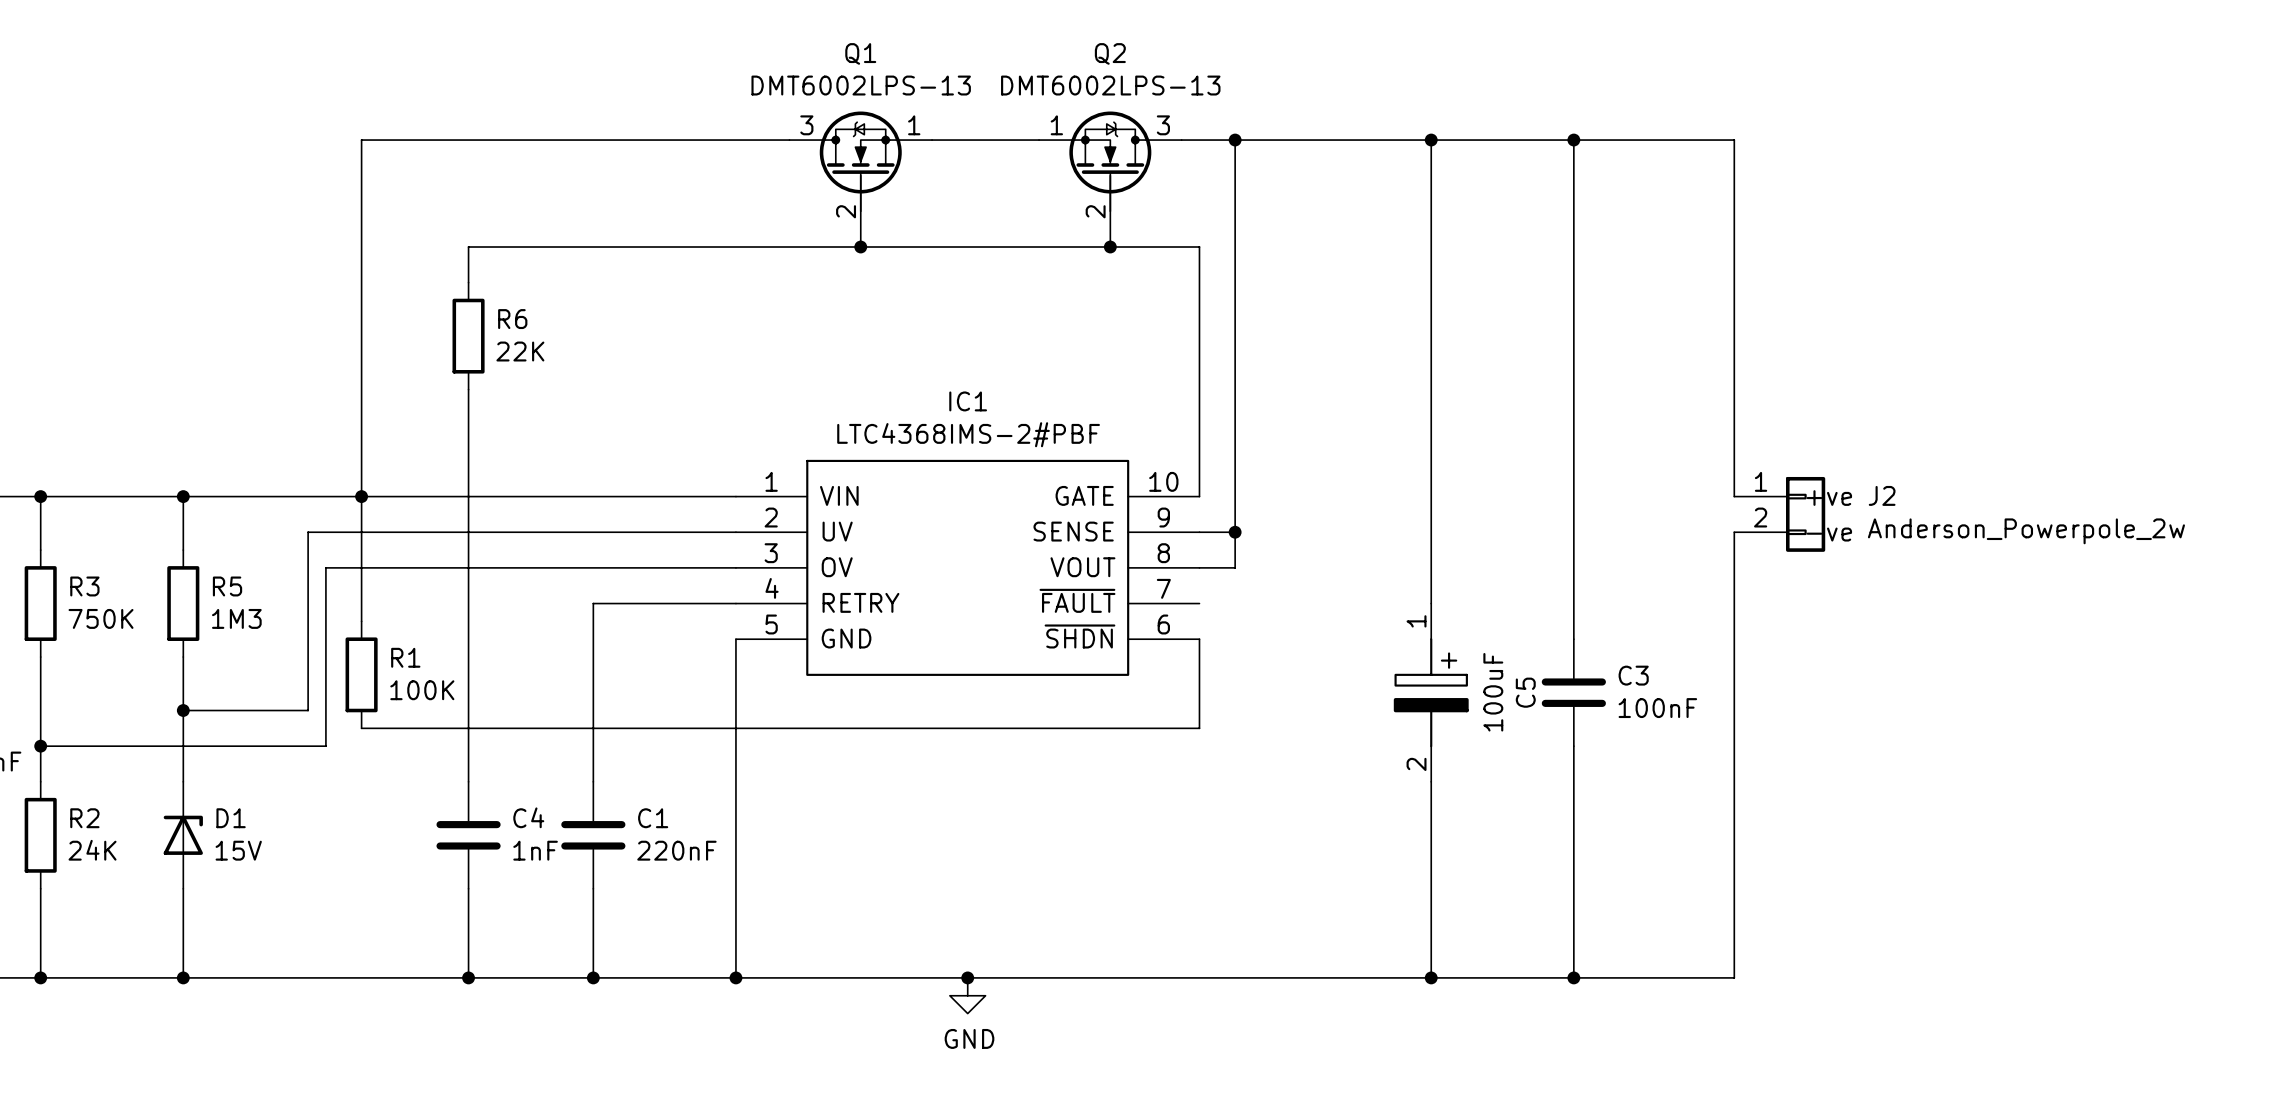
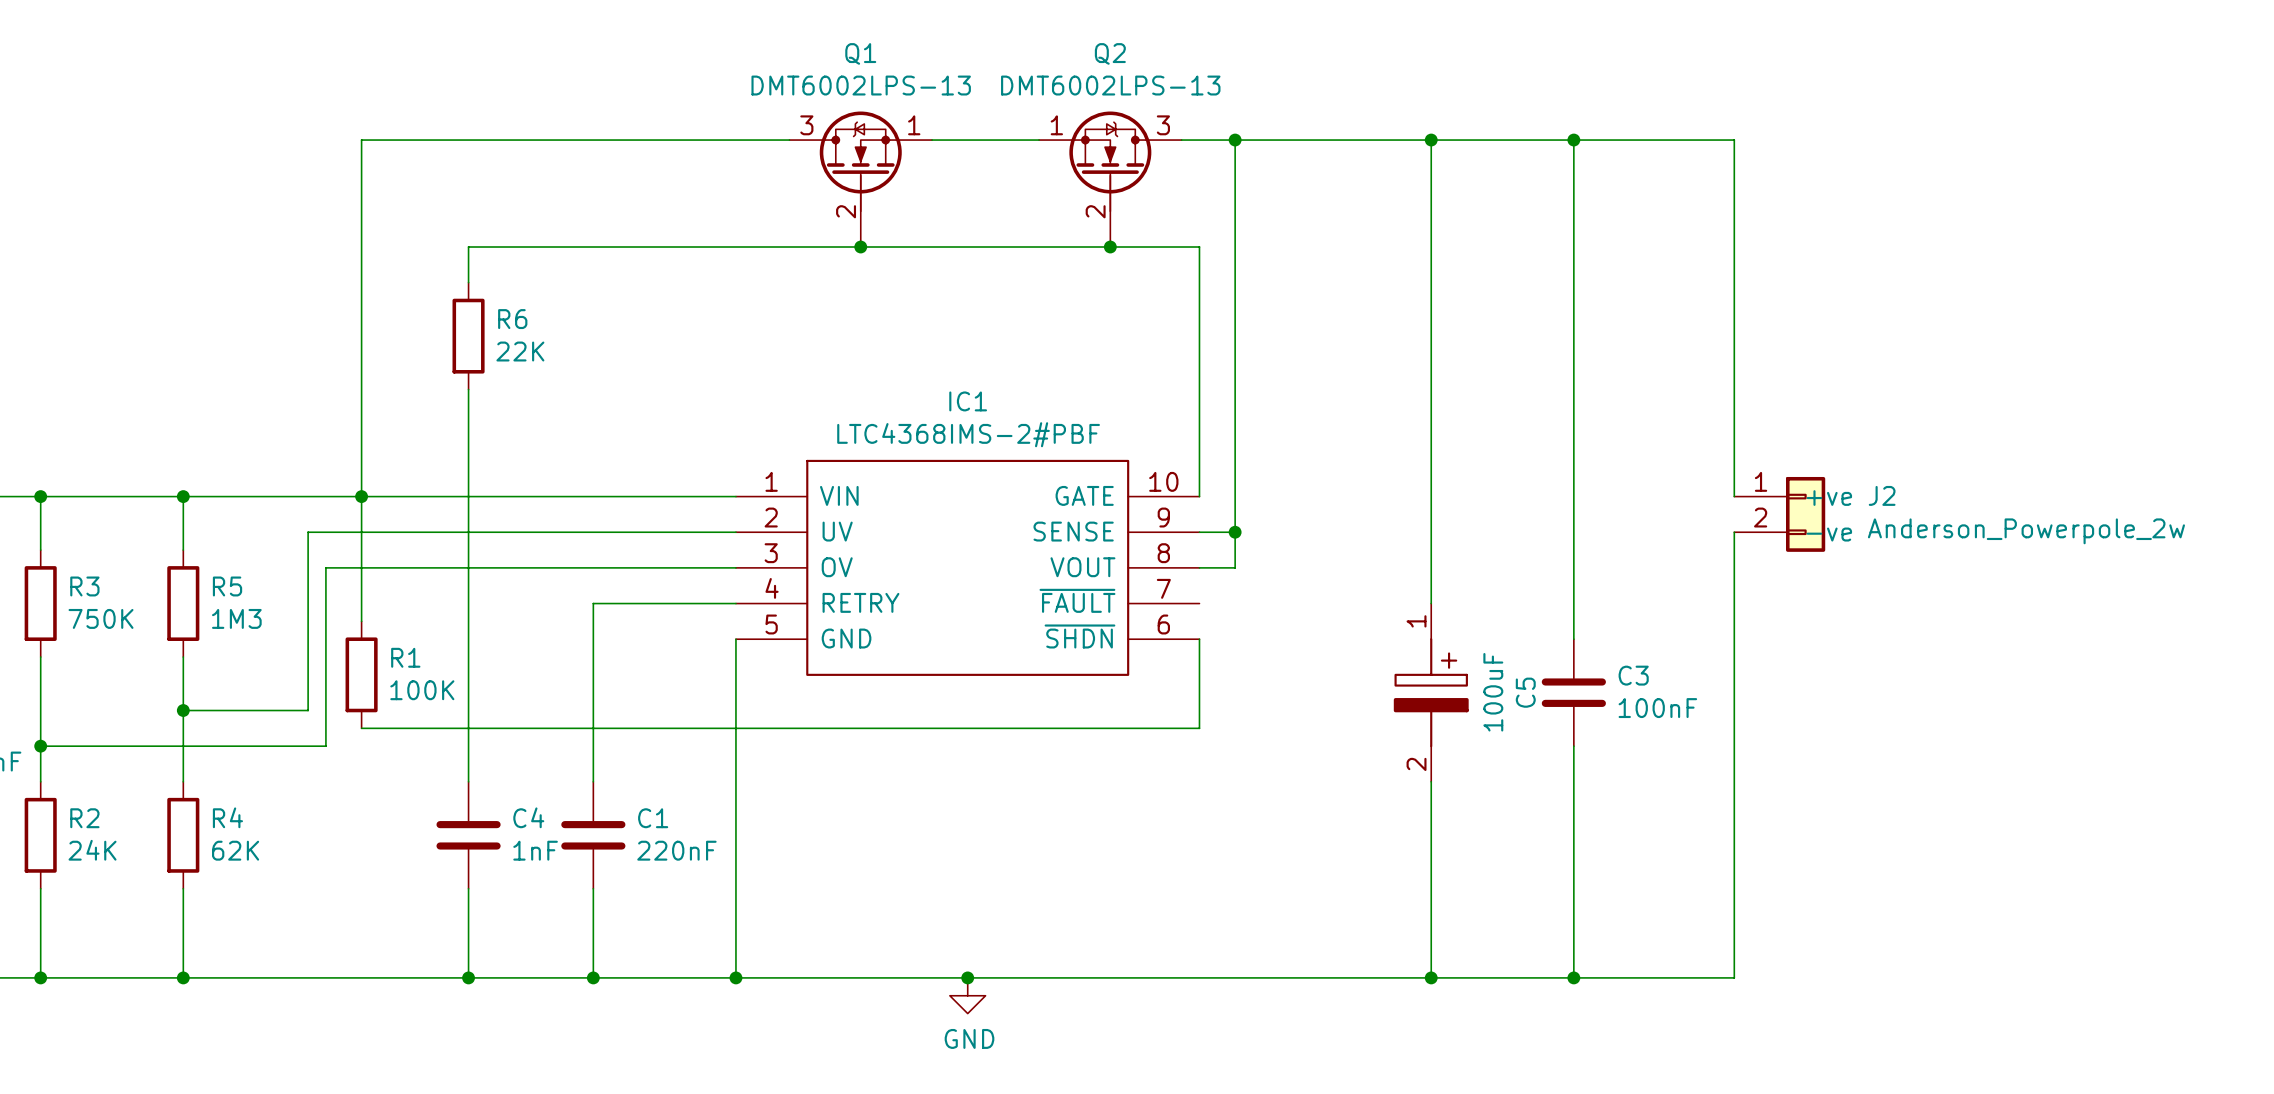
D1: 15V (183, 835) -> none
R4: none -> 62K (183, 835)

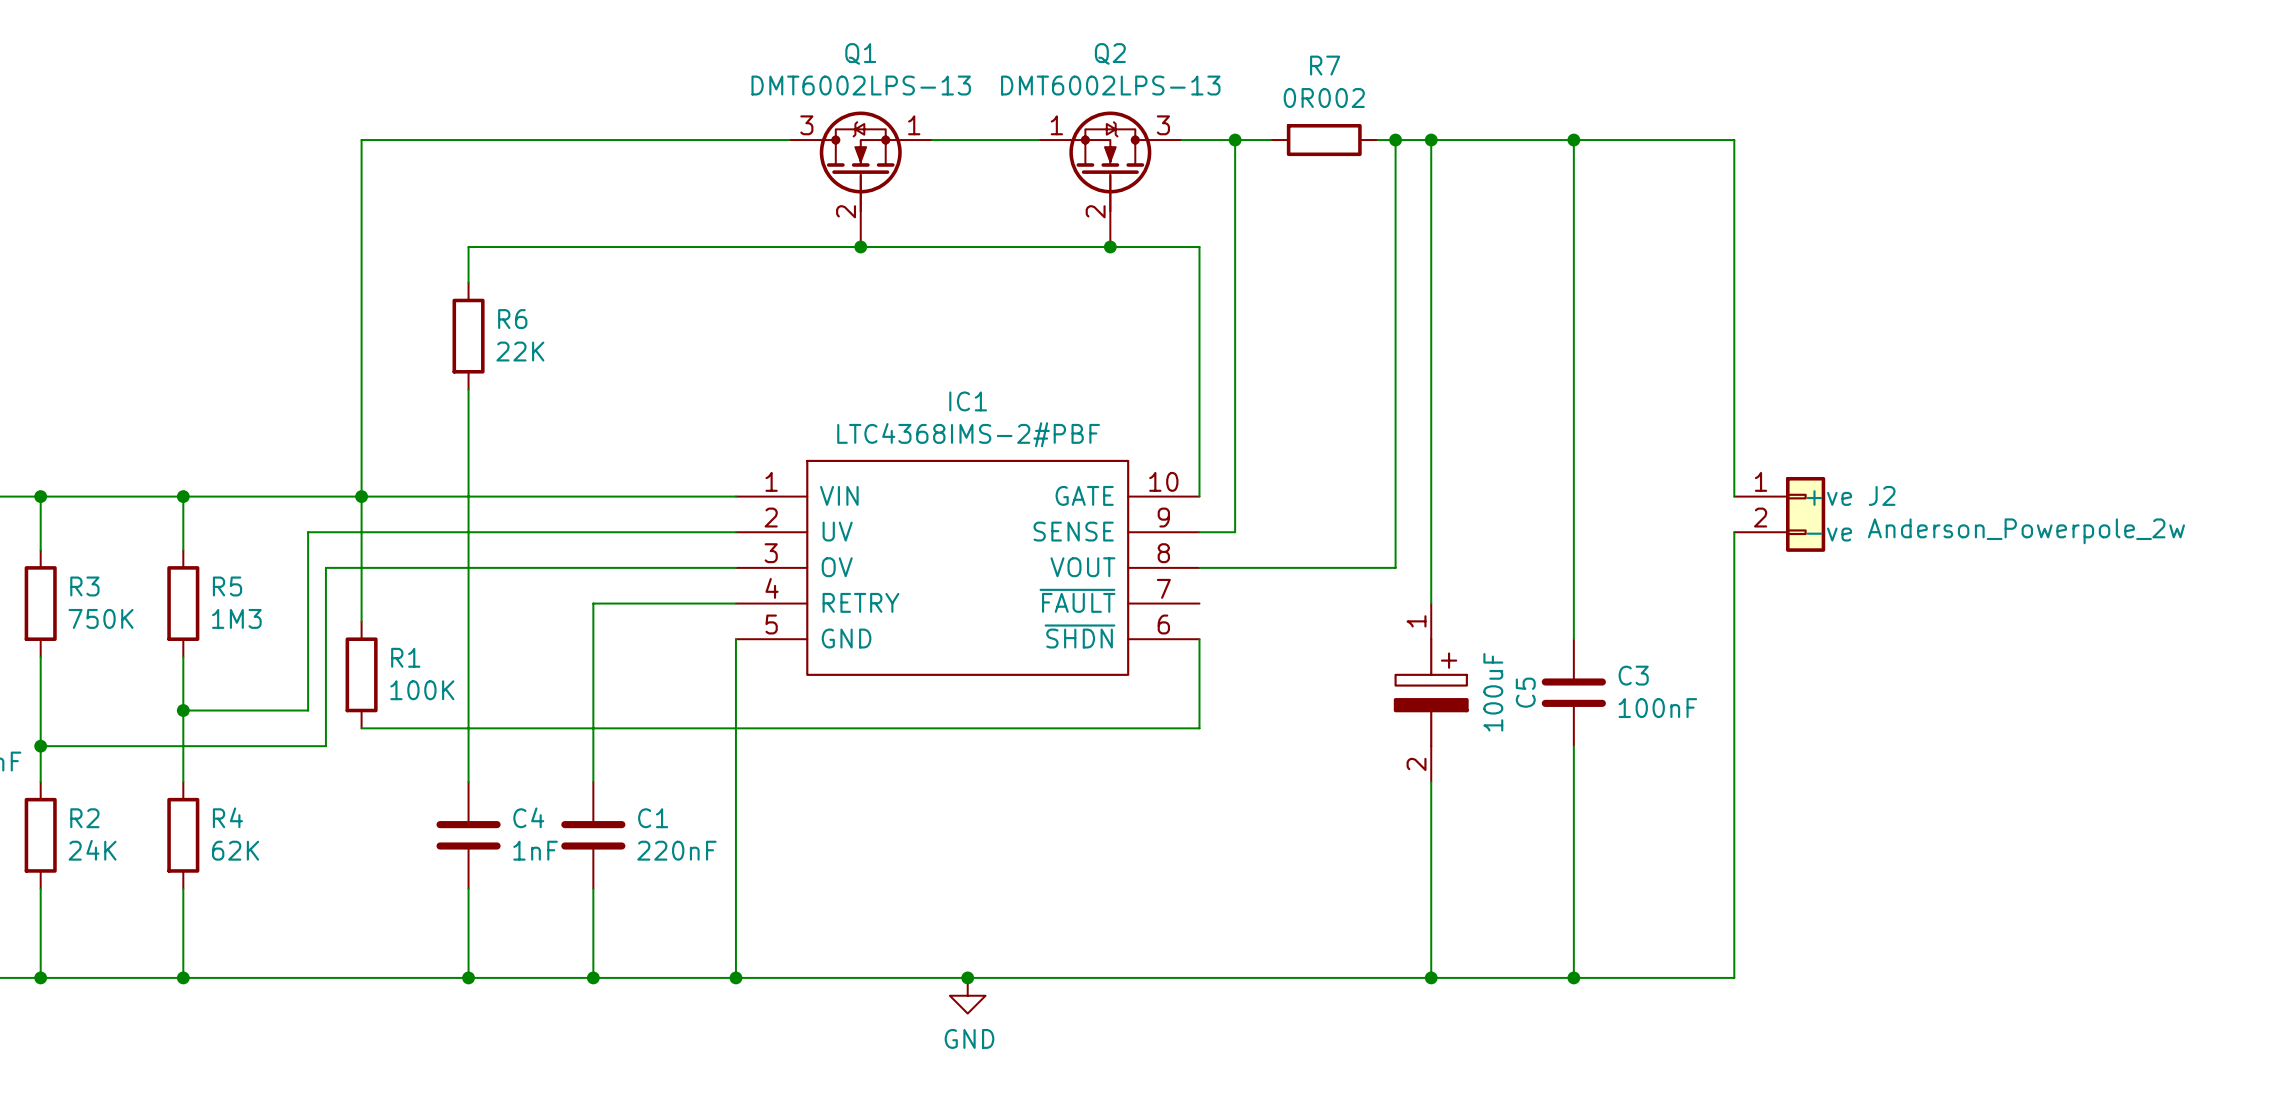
wire: (1270, 140) (1377, 140) -> none
R7: none -> 0R002 (1324, 140)
junction: none -> (1395, 140)
wire: (1235, 532) (1235, 567) -> (1395, 140) (1395, 567) (1235, 567)
junction: (1235, 532) -> none

